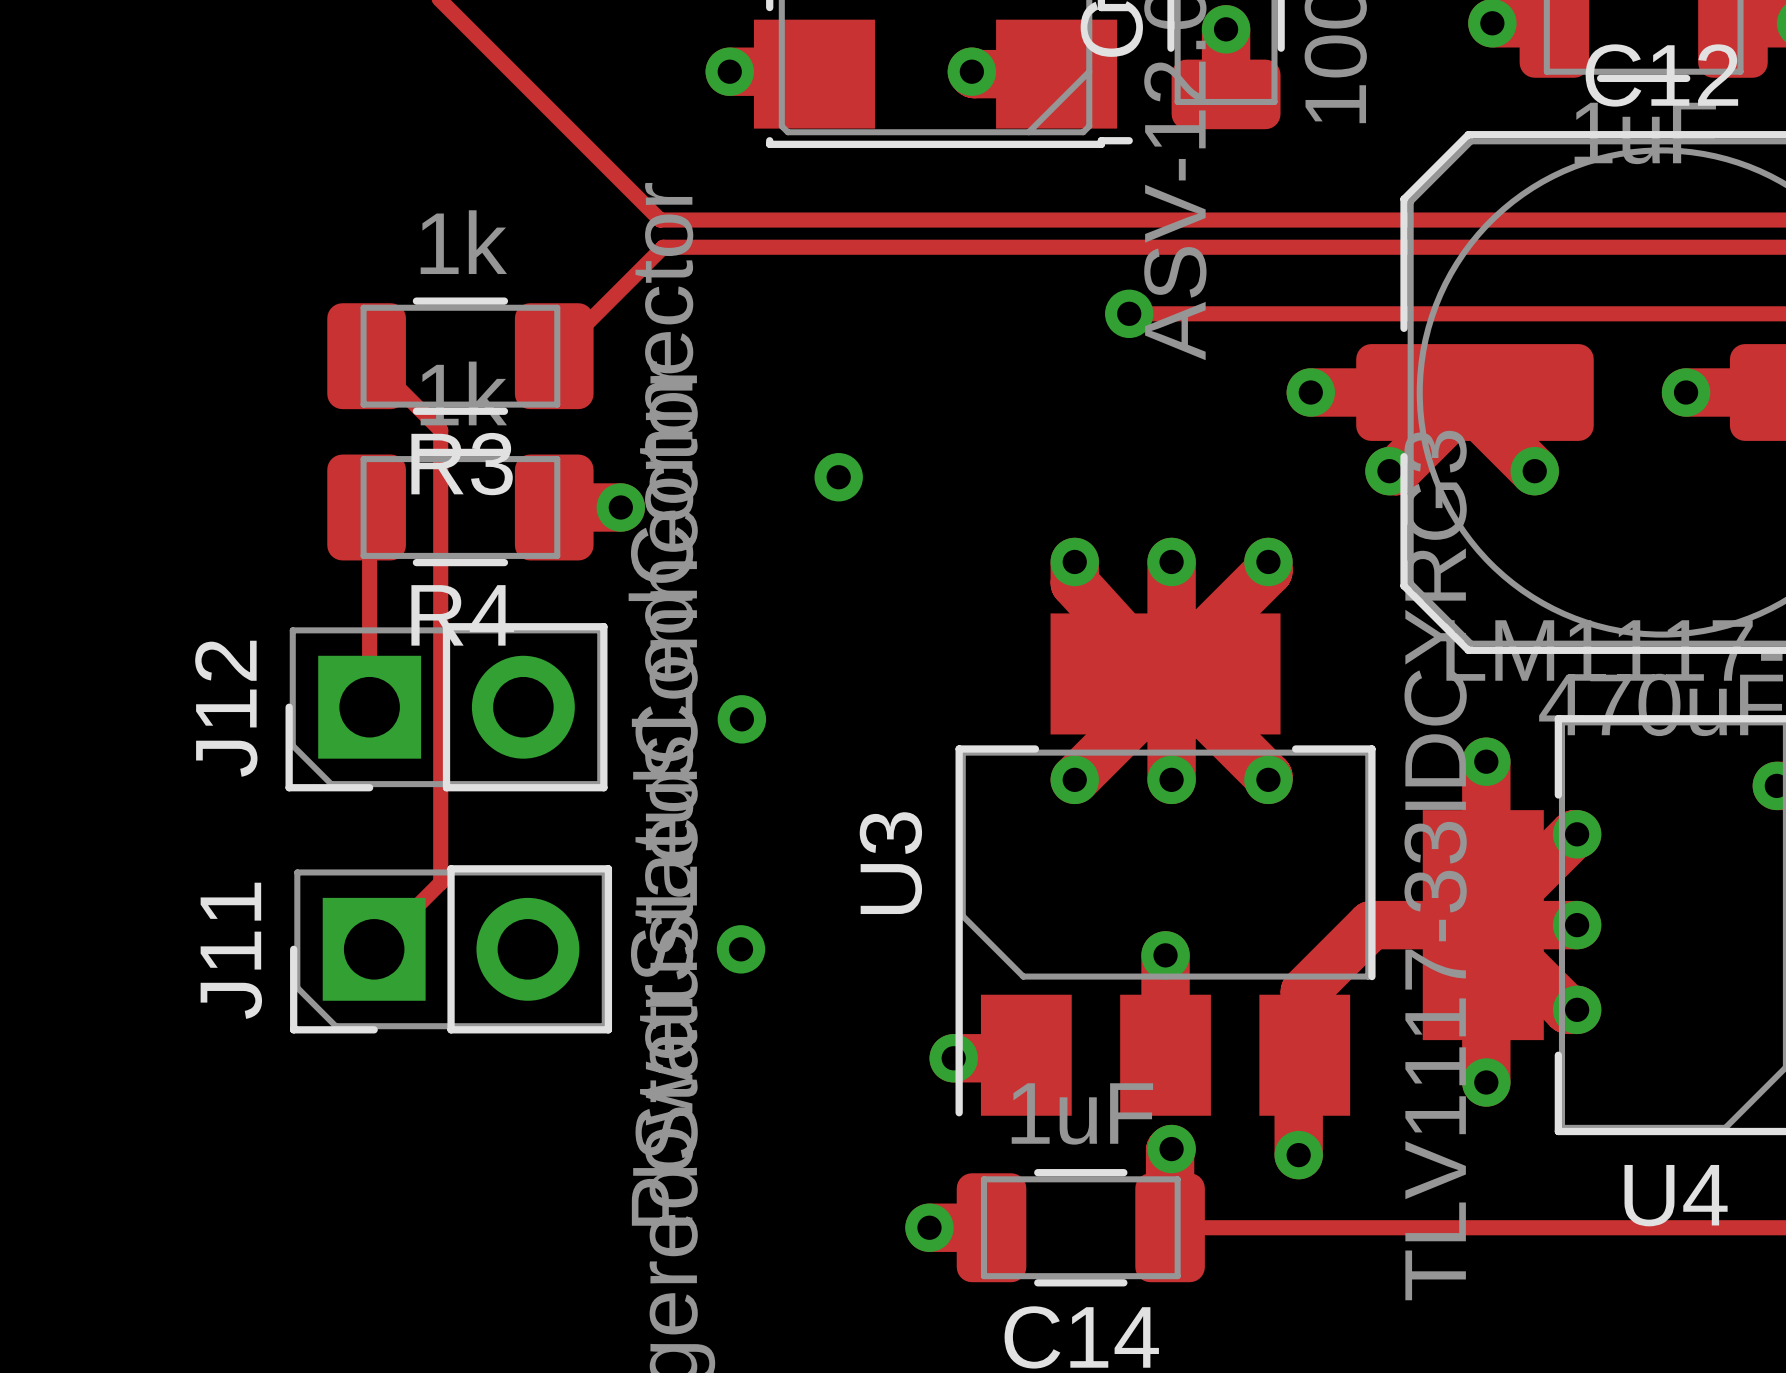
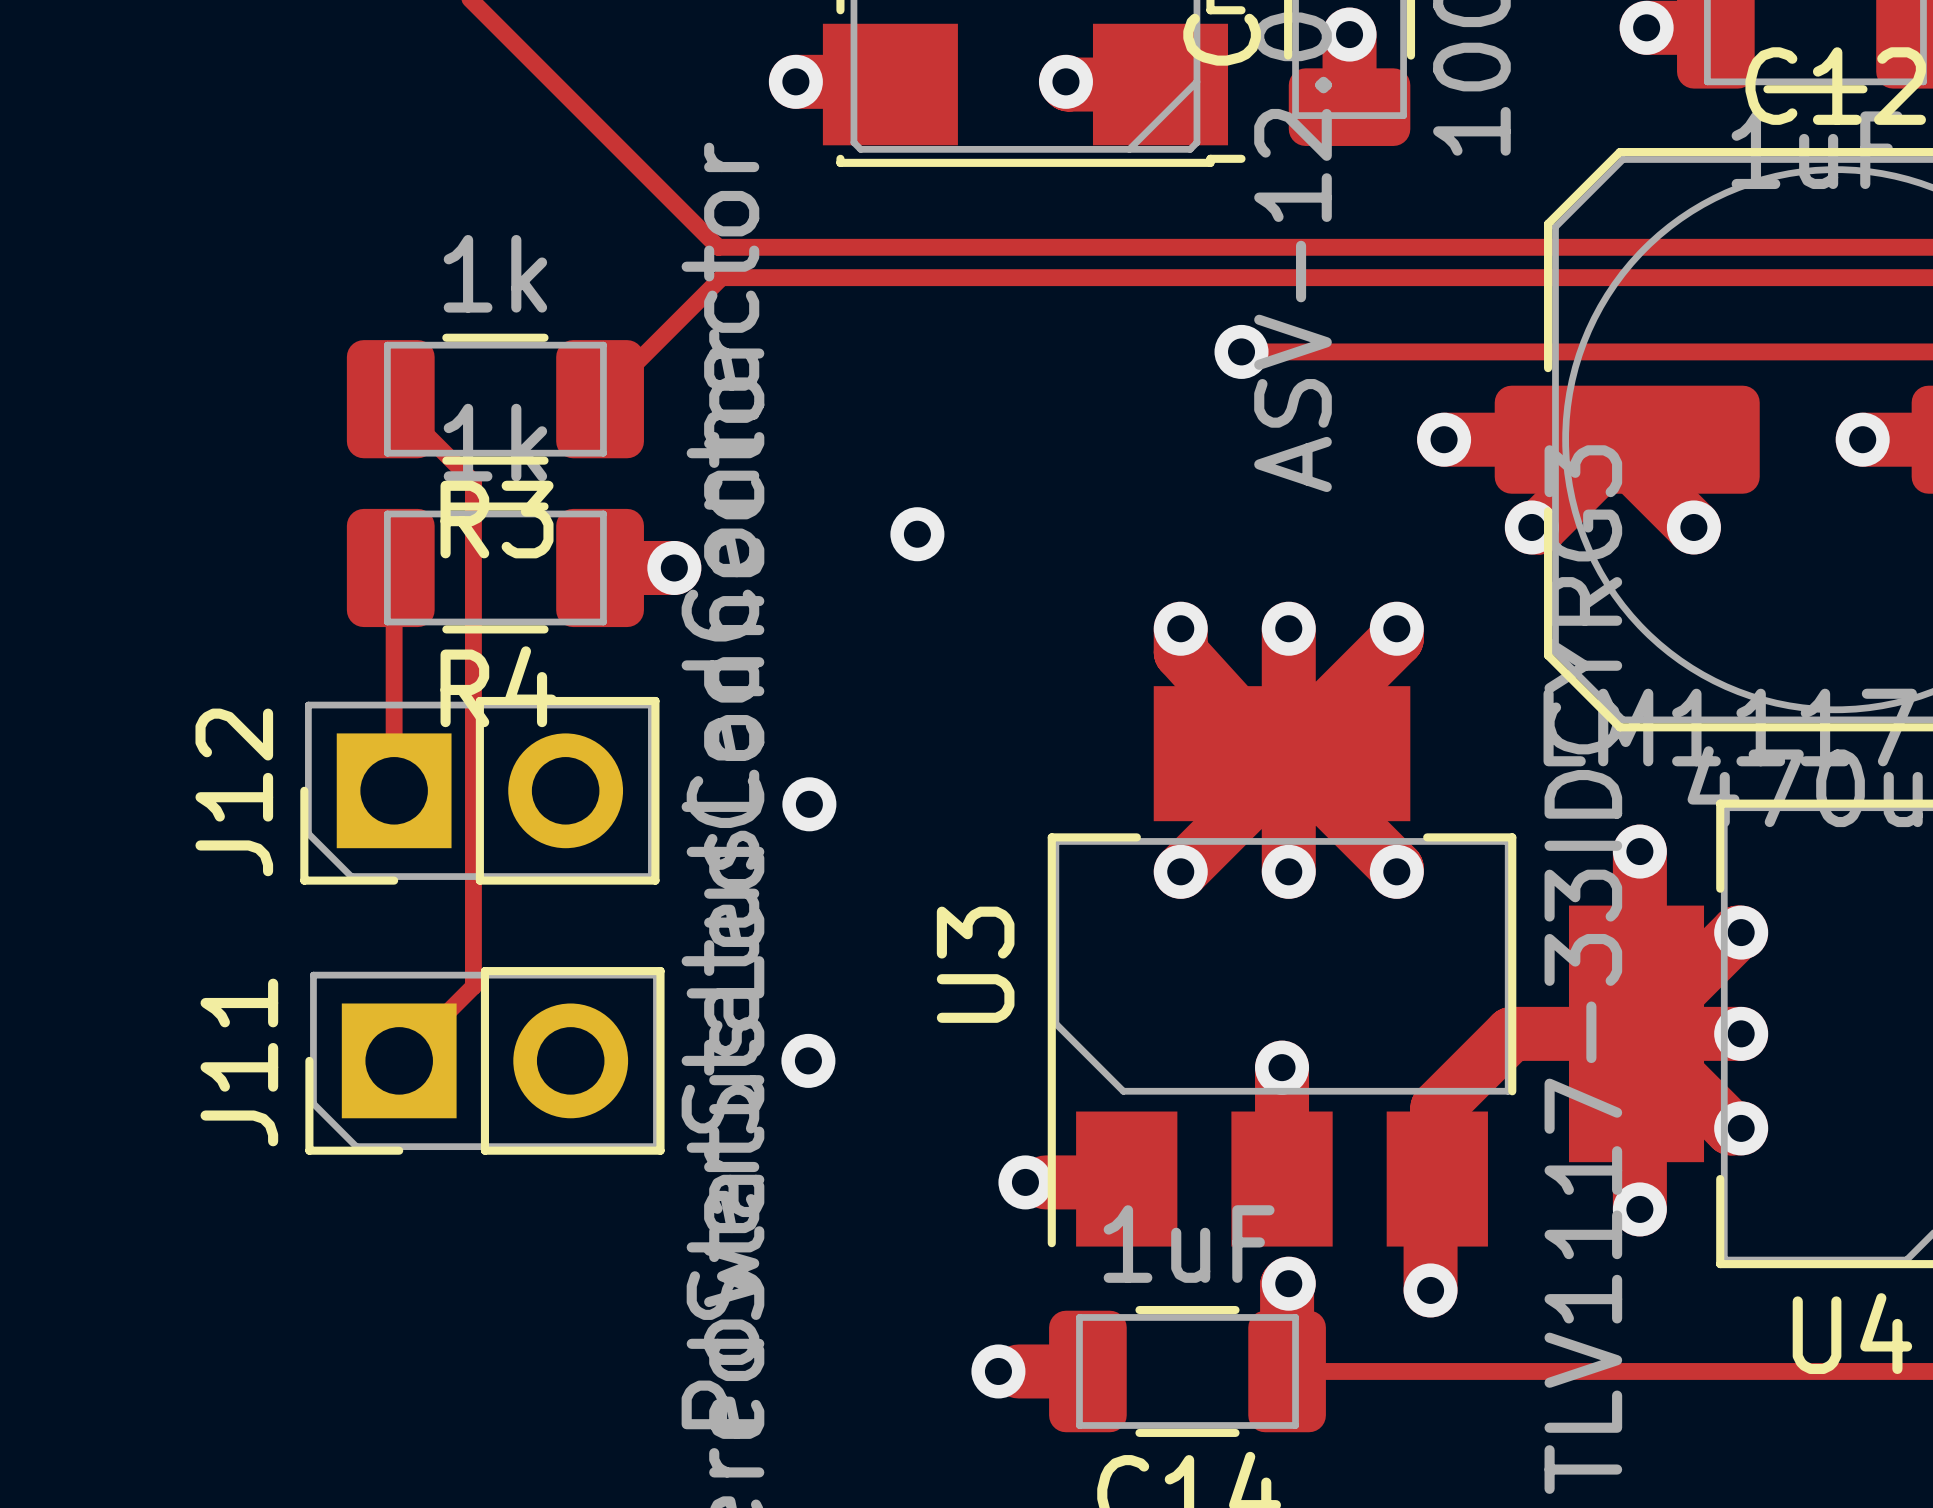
via position: (953, 1058) -> (1025, 1182)
via position: (929, 1227) -> (998, 1371)

